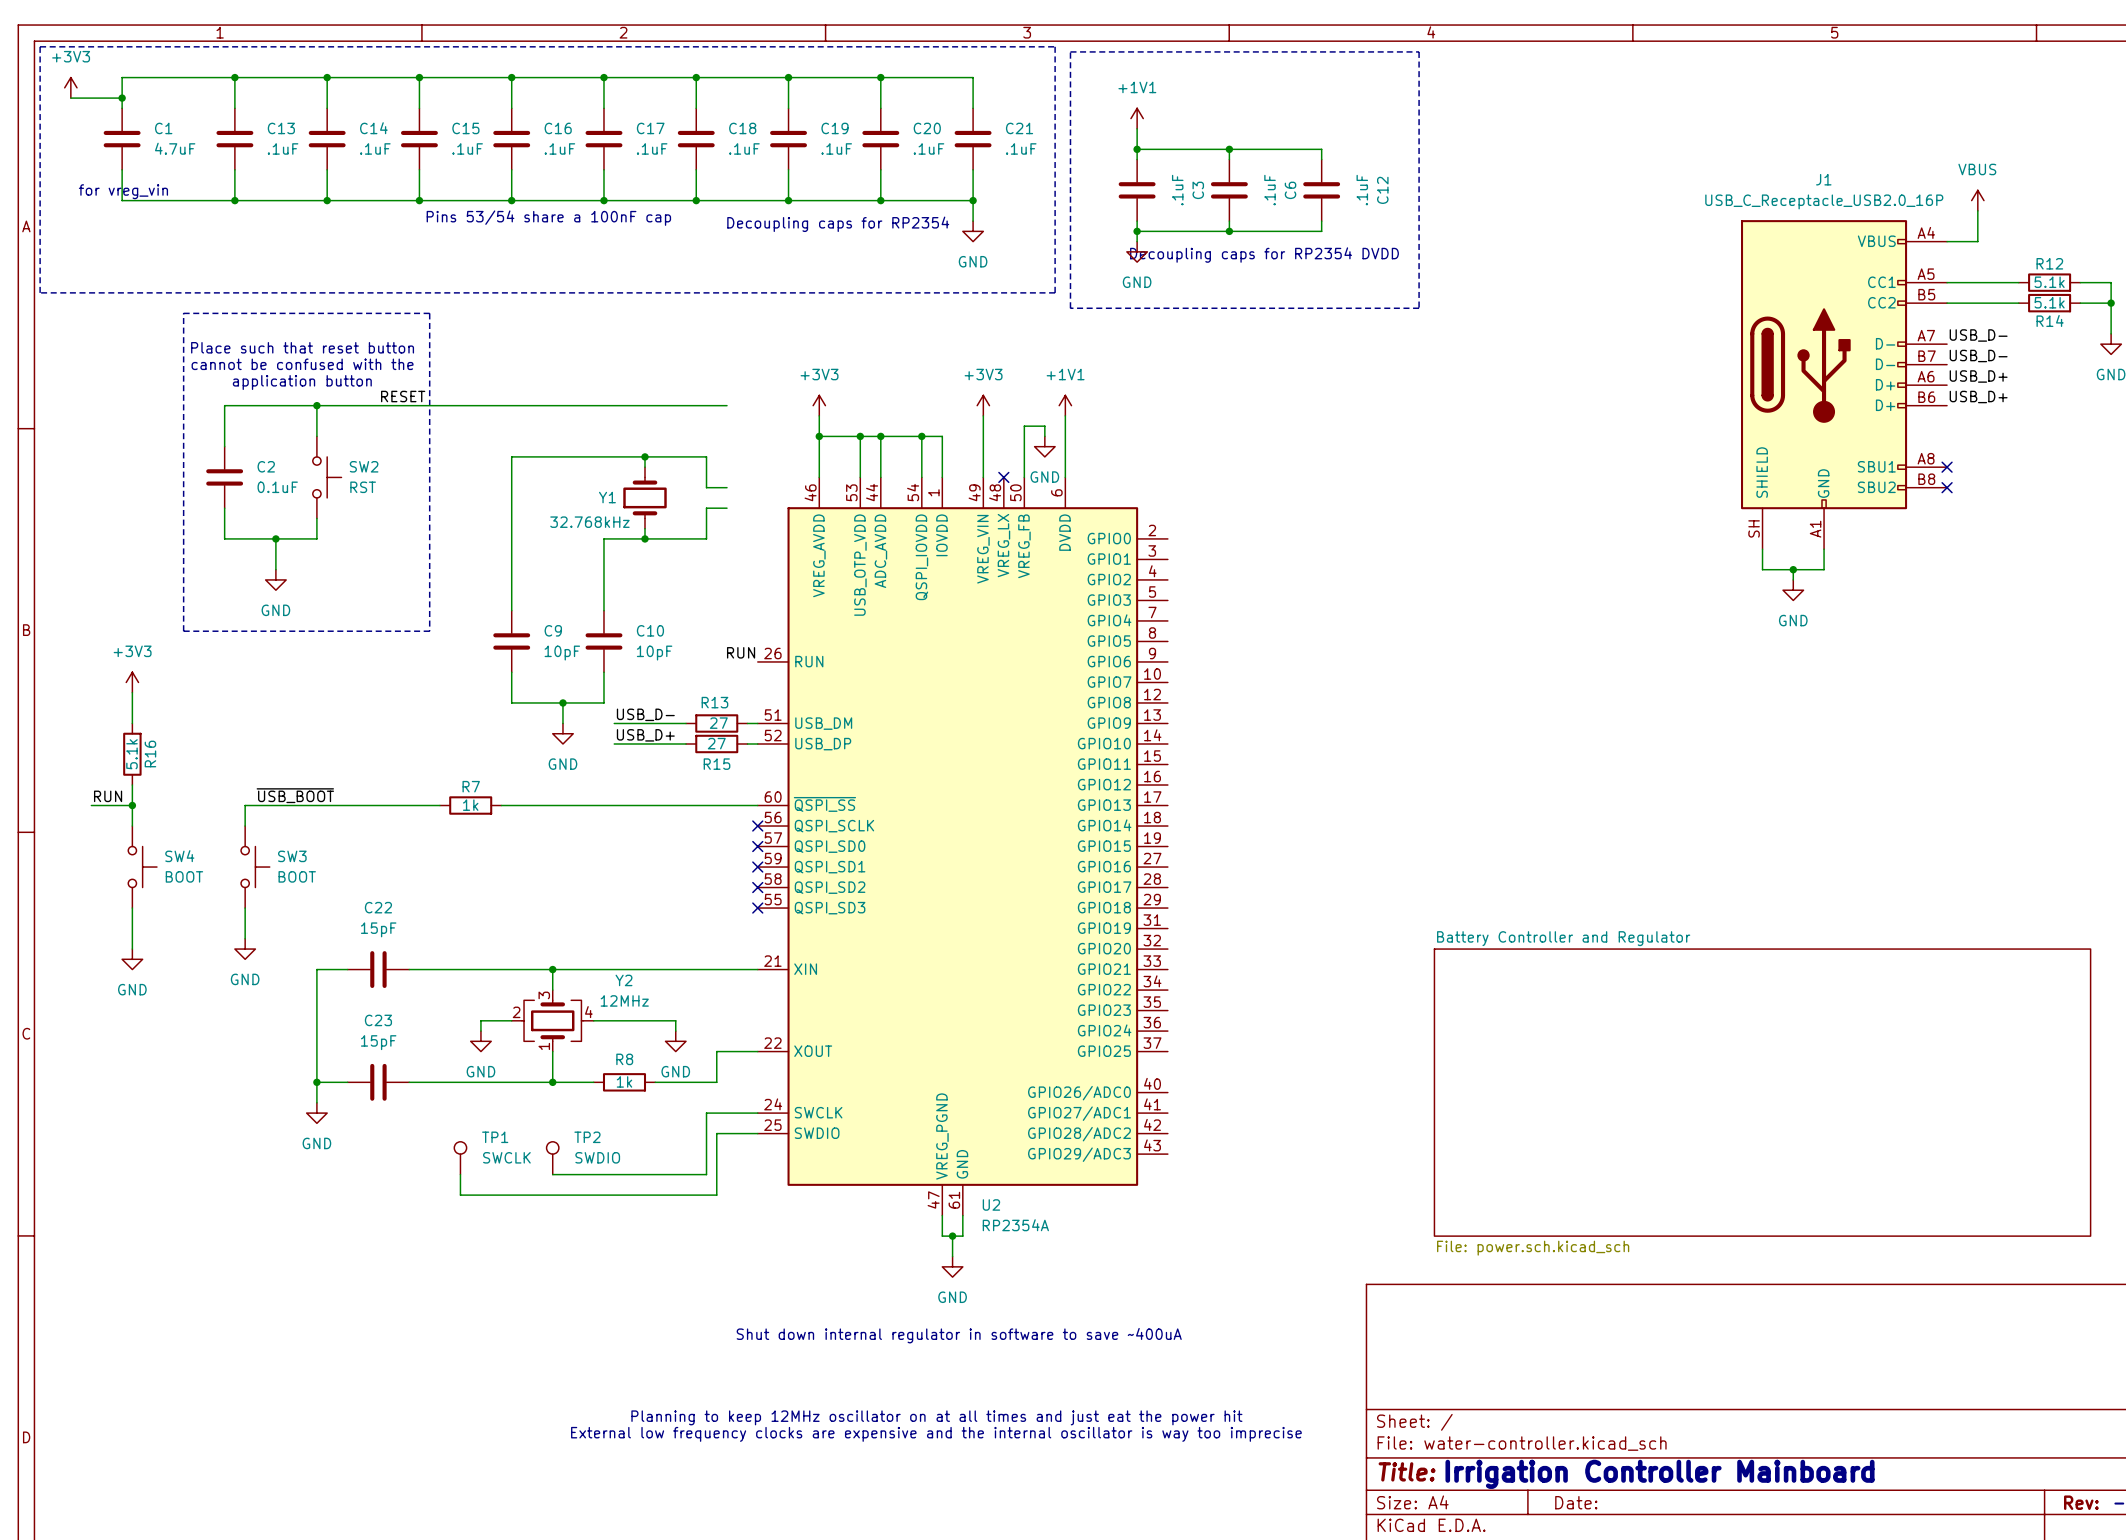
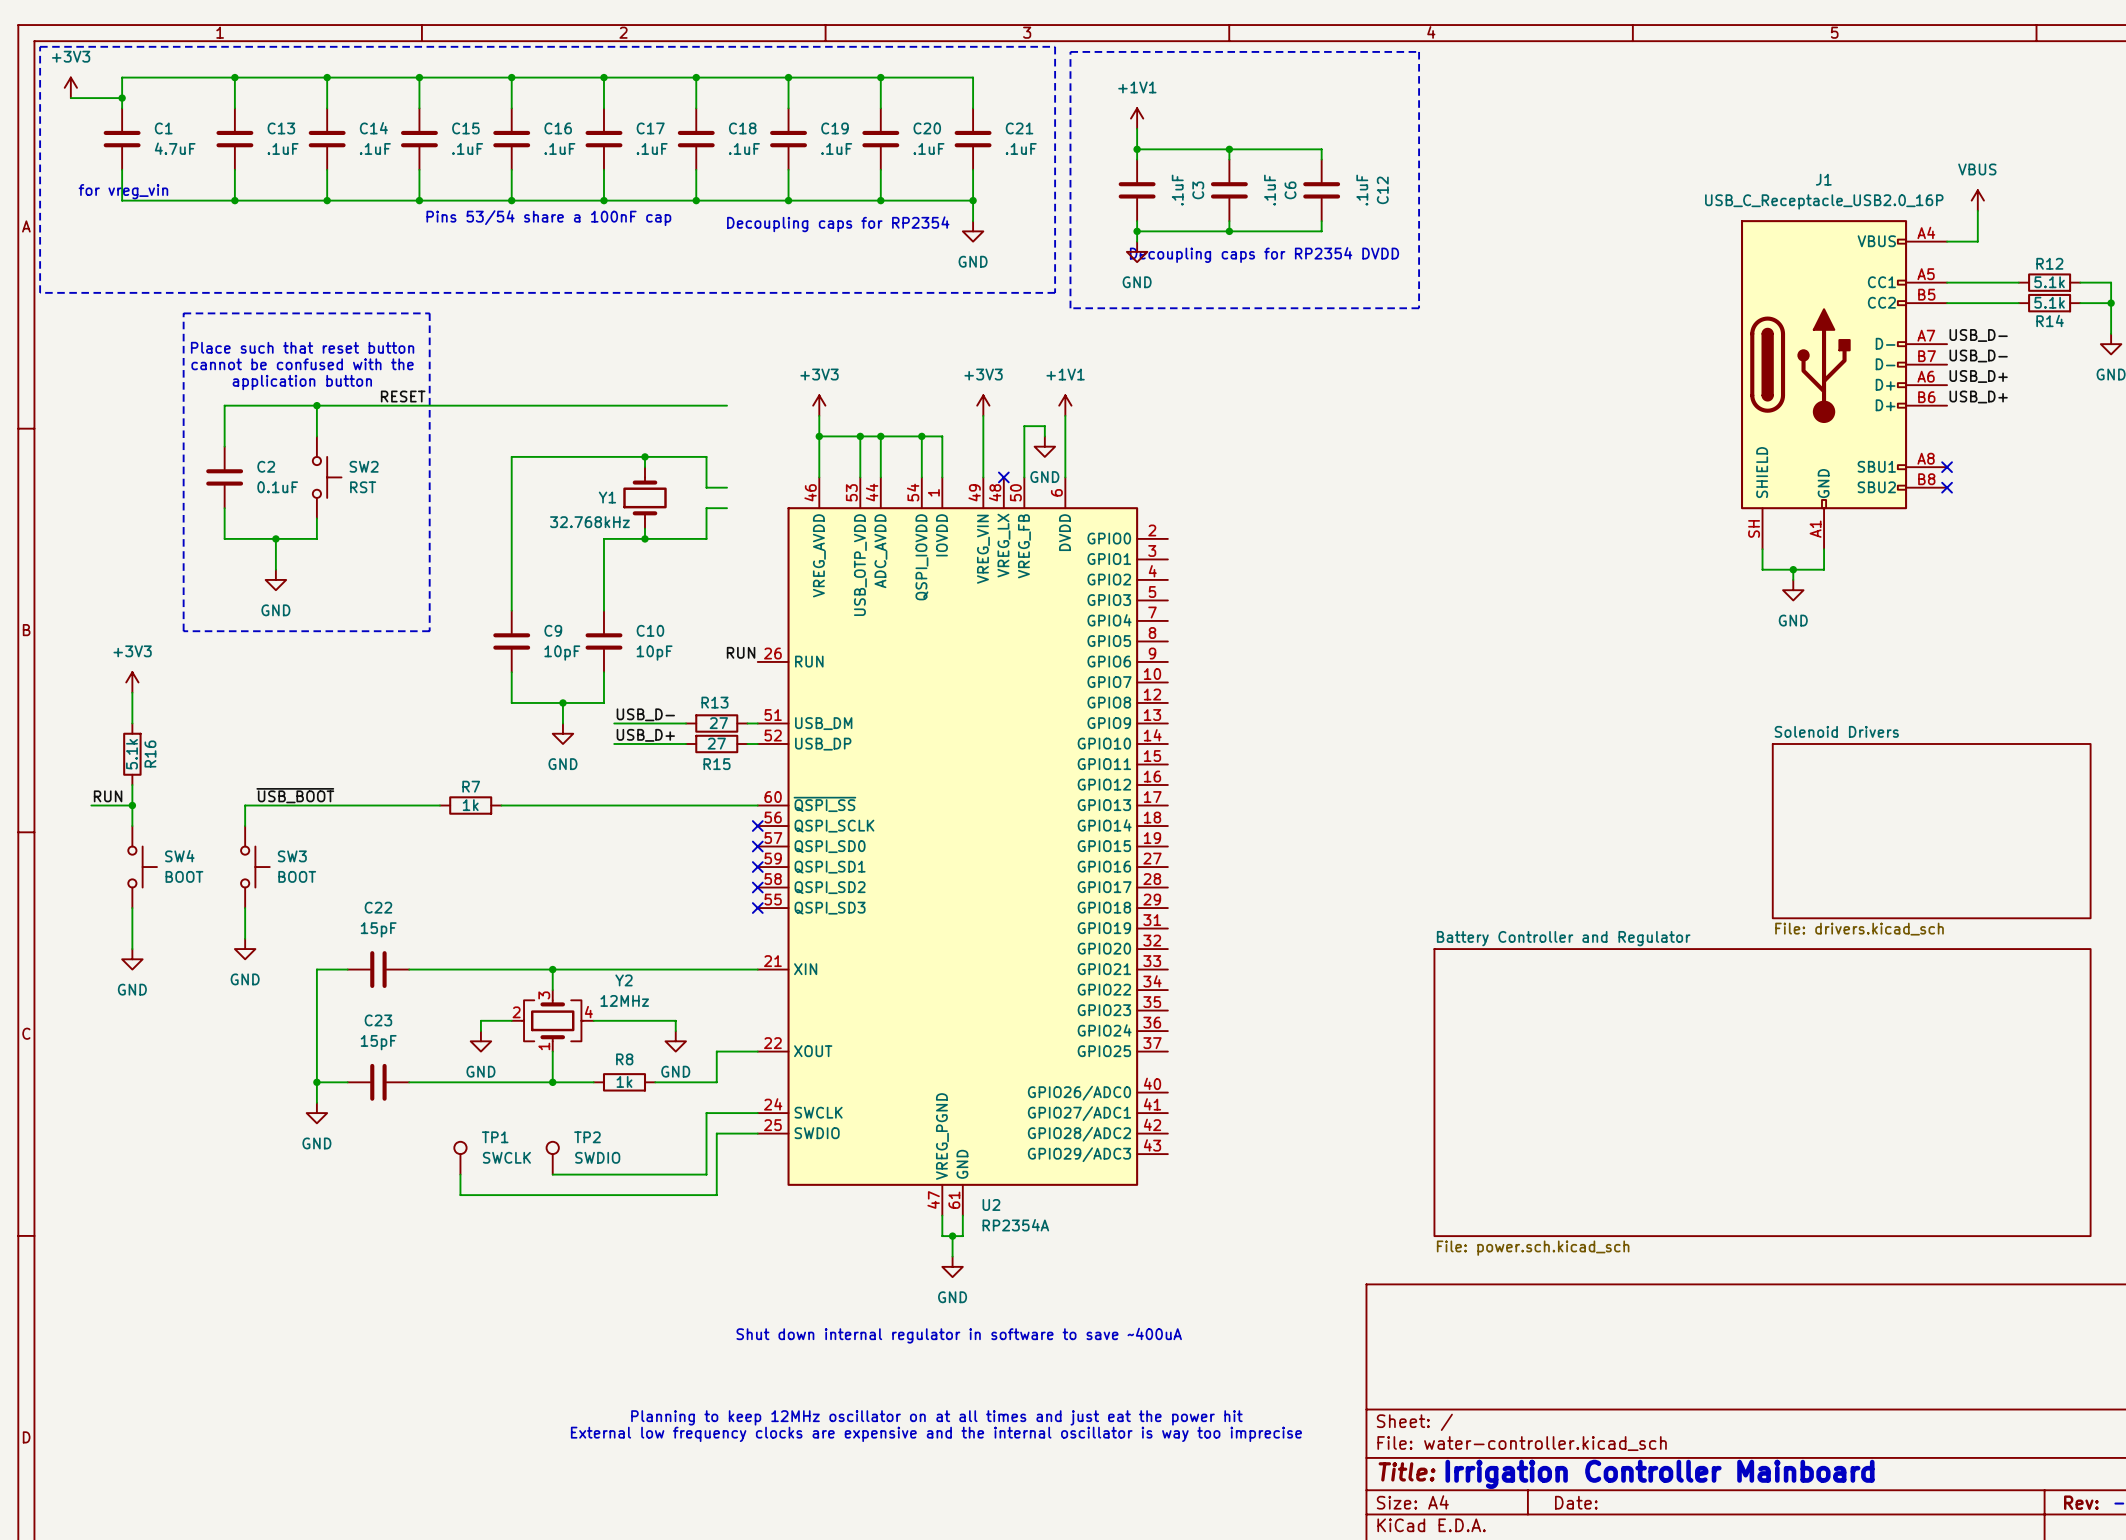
sheet Solenoid Drivers: none -> File: drivers.kicad_sch (1931, 831)

